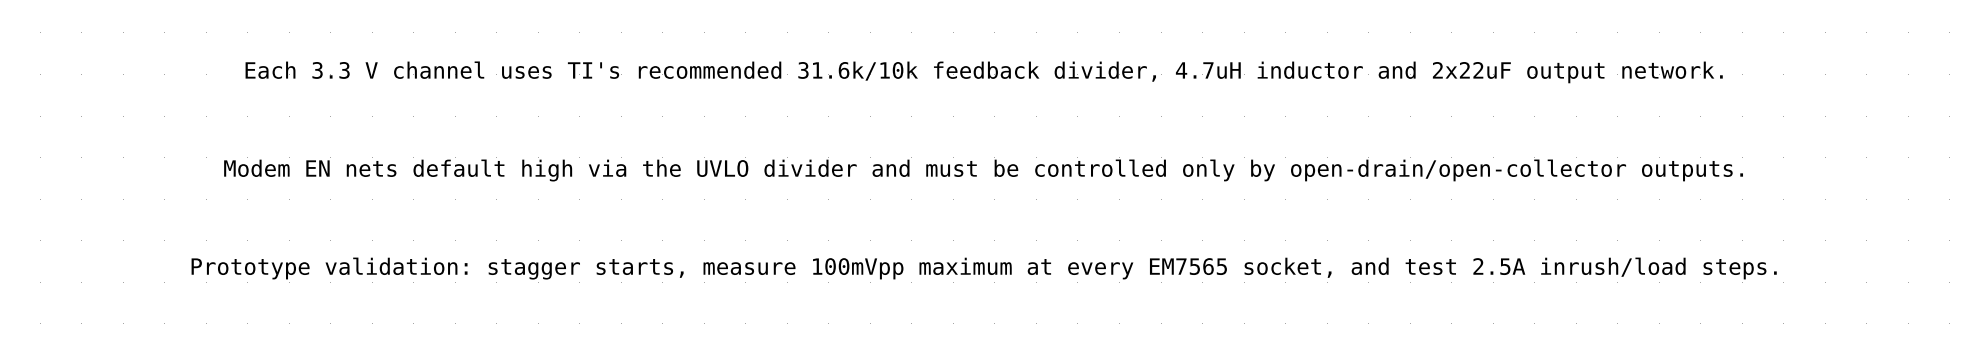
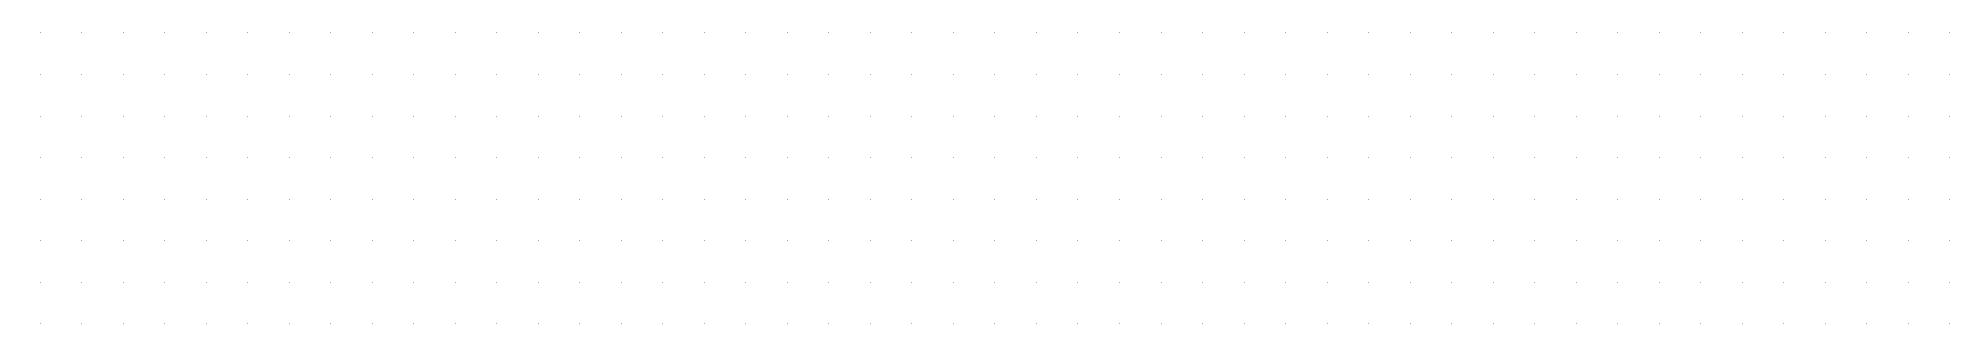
text: Each 3.3 V channel uses TI's recommended 31.6k/10k feedback divider, 4.7uH inductor and 2x22uF output network. (984, 72) -> none
text: Modem EN nets default high via the UVLO divider and must be controlled only by open-drain/open-collector outputs. (983, 170) -> none
text: Prototype validation: stagger starts, measure 100mVpp maximum at every EM7565 socket, and test 2.5A inrush/load steps. (984, 268) -> none

